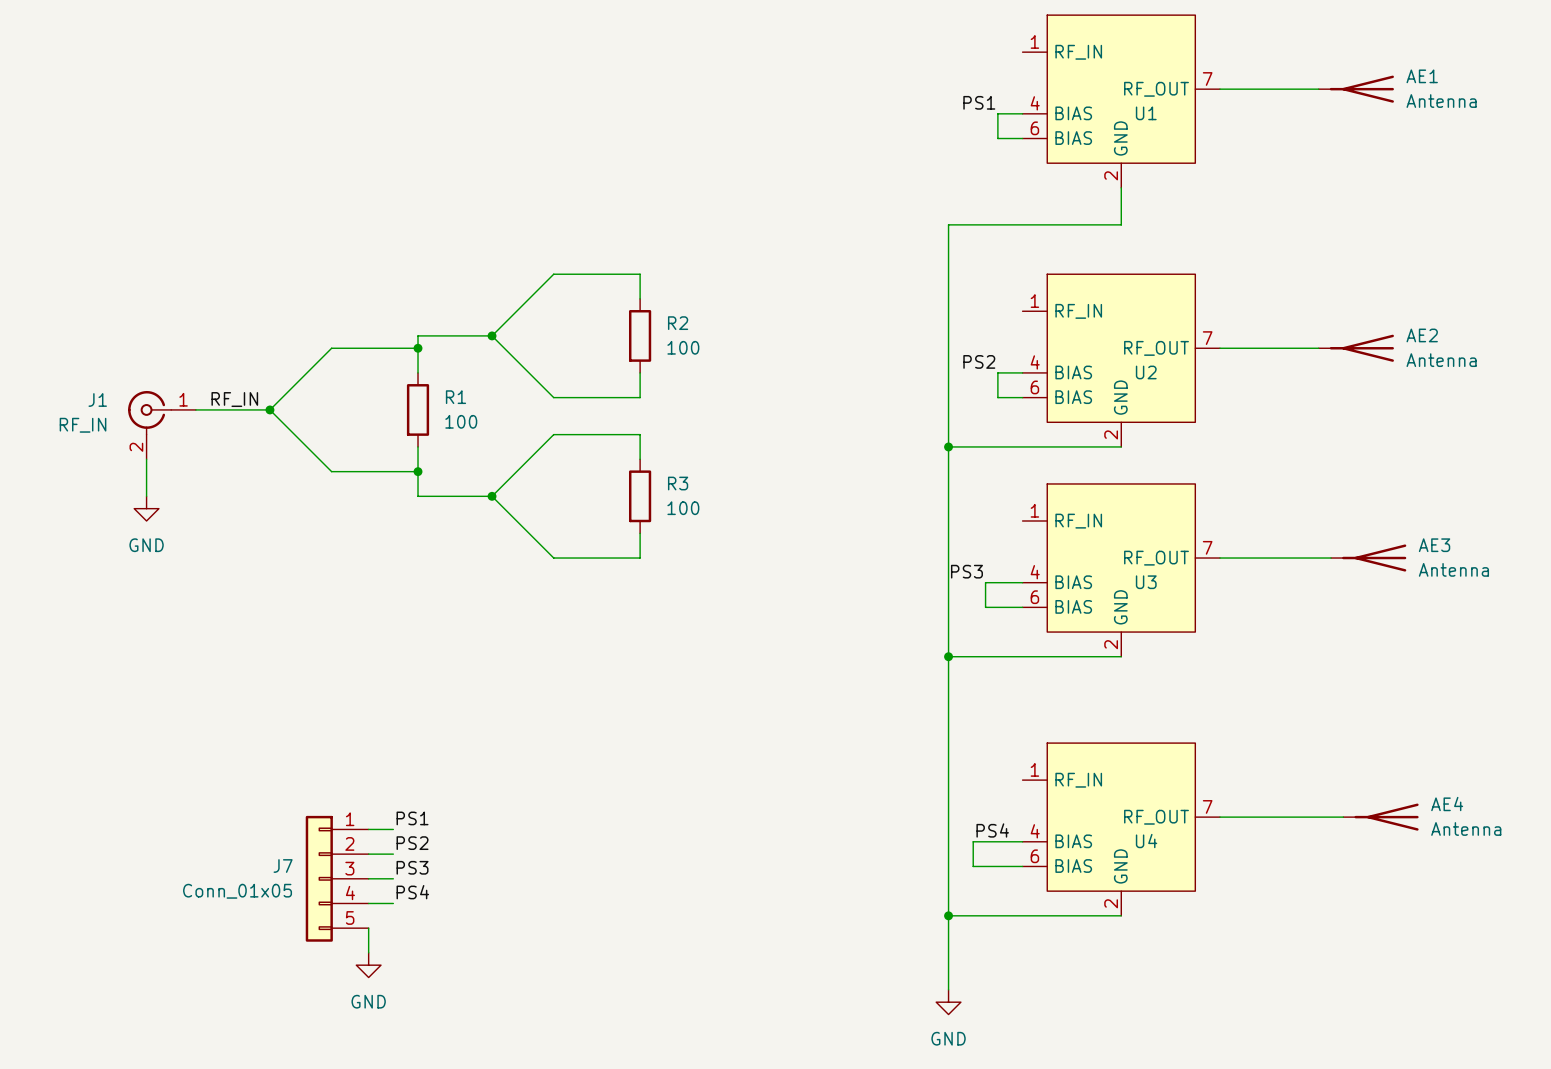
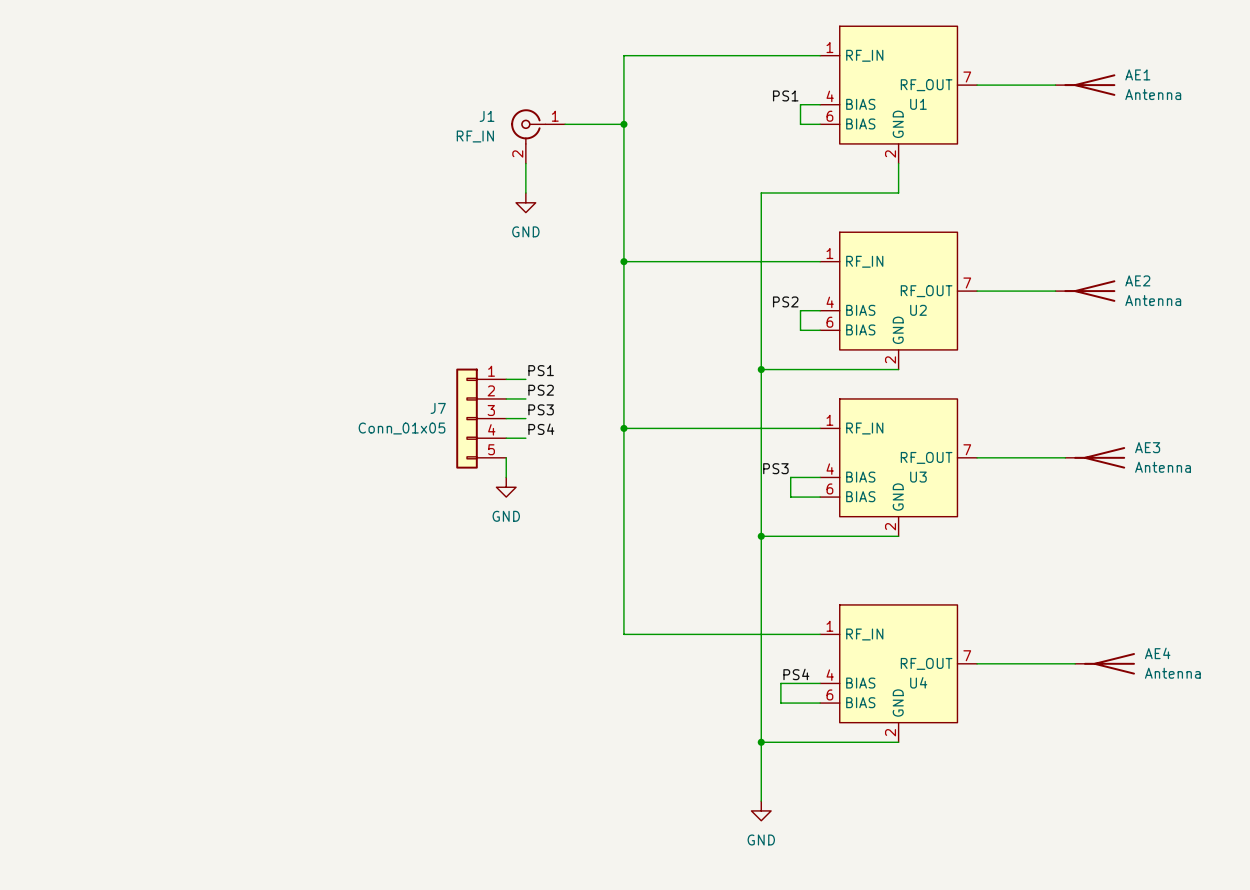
wire: none -> (820, 55) (623, 55) (623, 634) (820, 634)
wire: none -> (565, 124) (623, 124)
junction: none -> (623, 124)
wire: none -> (525, 163) (525, 192)
power symbol: none -> GND (525, 202)
wire: (640, 298) (640, 274) (553, 274) (492, 335) -> none
wire: none -> (623, 261) (820, 261)
junction: none -> (623, 261)
wire: (492, 335) (553, 397) (640, 397) (640, 372) -> none
wire: (492, 335) (418, 335) (418, 372) -> none
junction: (492, 335) -> none
R2: 100 (640, 335) -> none
wire: (418, 348) (331, 348) (269, 409) -> none
junction: (418, 348) -> none
label: RF_IN (234, 399) -> none
wire: (195, 409) (269, 409) -> none
wire: (269, 409) (331, 471) (418, 471) -> none
junction: (269, 409) -> none
R1: 100 (418, 409) -> none
J1 position: (161, 425) -> (538, 136)
wire: (418, 446) (418, 496) (492, 496) -> none
label: none -> PS1 (541, 370)
wire: (146, 459) (146, 496) -> none
wire: none -> (506, 379) (525, 379)
wire: (640, 459) (640, 434) (553, 434) (492, 496) -> none
junction: (418, 471) -> none
label: none -> PS2 (541, 390)
wire: none -> (506, 398) (525, 398)
wire: (492, 496) (553, 558) (640, 558) (640, 533) -> none
junction: (492, 496) -> none
R3: 100 (640, 496) -> none
label: none -> PS3 (541, 409)
power symbol: GND (146, 508) -> none
wire: none -> (506, 418) (525, 418)
wire: none -> (623, 428) (820, 428)
junction: none -> (623, 428)
label: none -> PS4 (541, 429)
wire: none -> (506, 438) (525, 438)
wire: none -> (506, 457) (506, 477)
power symbol: none -> GND (506, 487)
label: PS1 (412, 818) -> none
wire: (368, 829) (393, 829) -> none
label: PS2 (412, 843) -> none
wire: (368, 854) (393, 854) -> none
label: PS3 (412, 867) -> none
J7 position: (337, 878) -> (481, 418)
wire: (368, 878) (393, 878) -> none
label: PS4 (412, 892) -> none
wire: (368, 903) (393, 903) -> none
wire: (368, 928) (368, 952) -> none
power symbol: GND (368, 965) -> none

